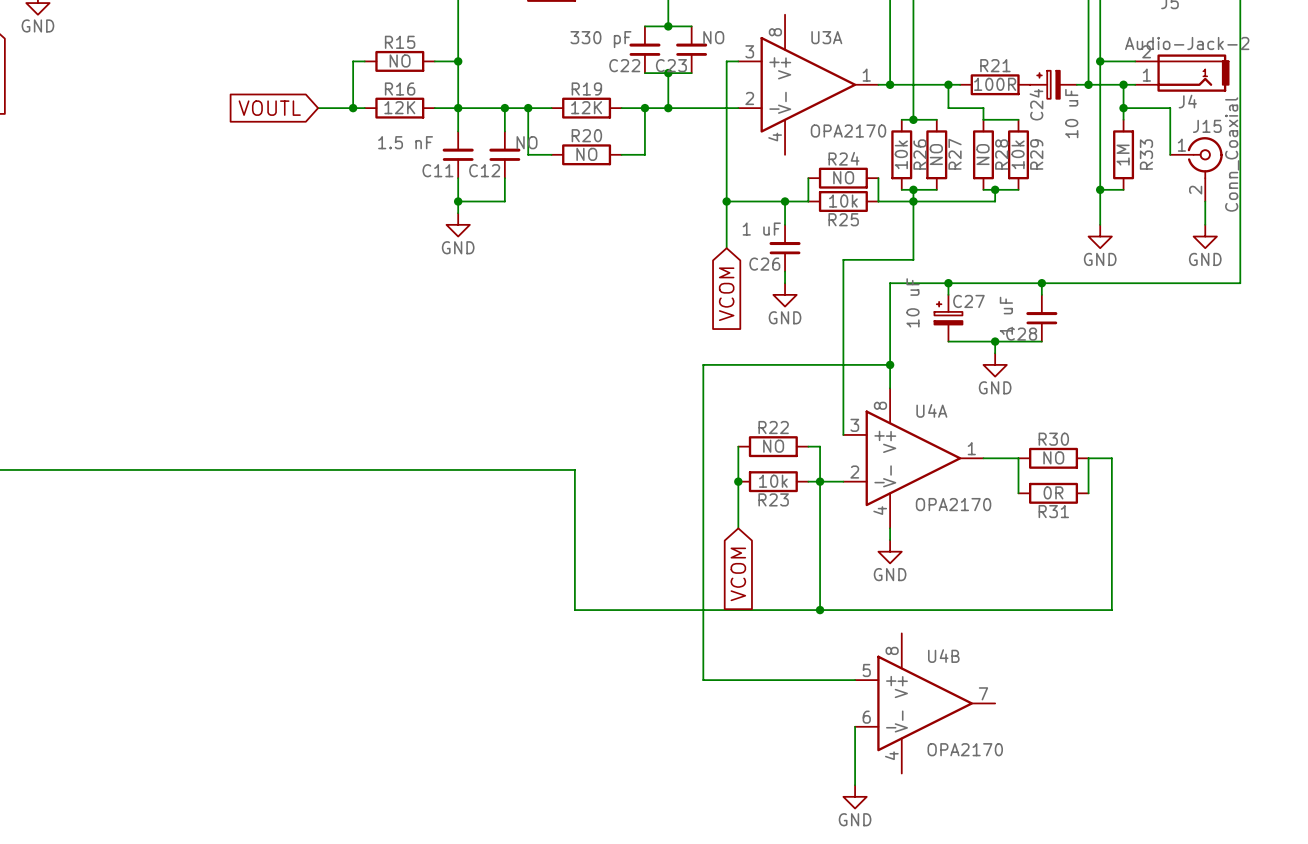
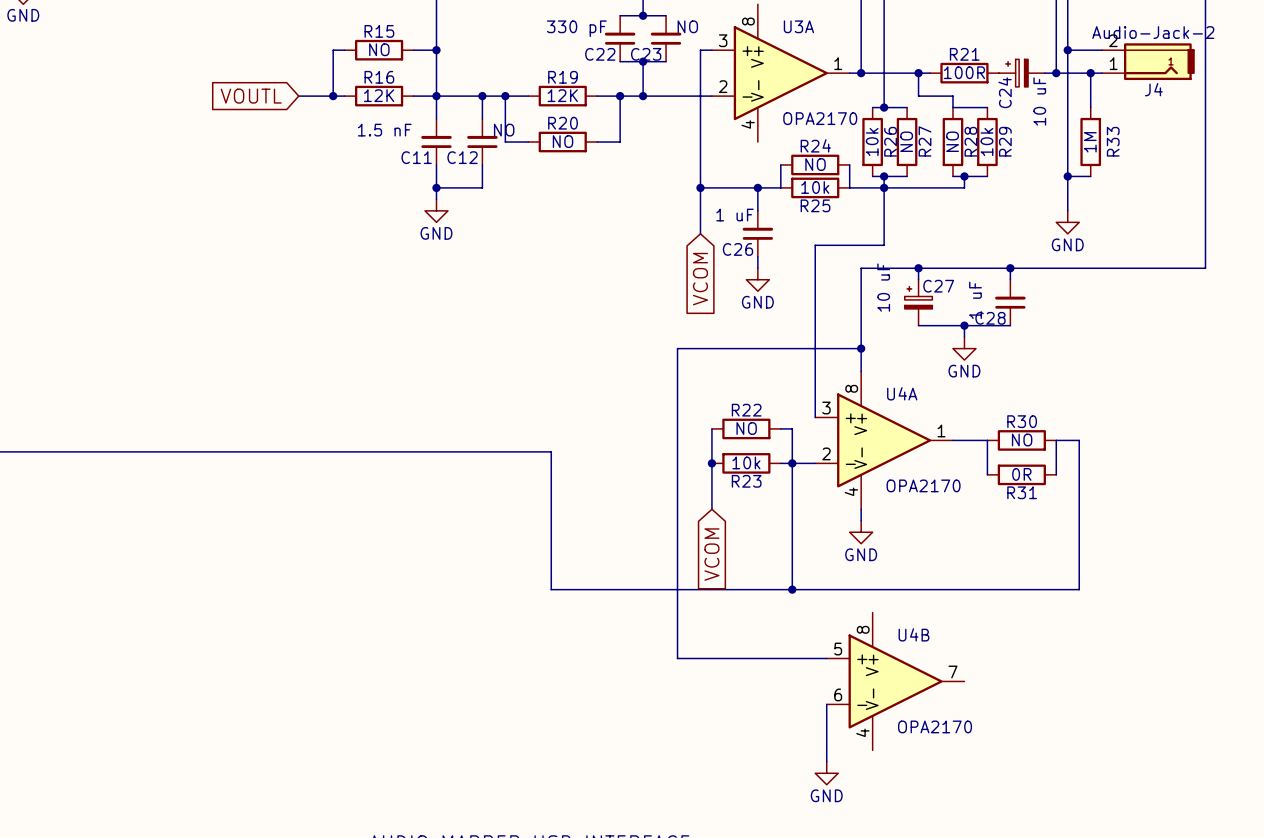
wire: (1123, 108) (1170, 108) (1170, 154) -> none
junction: (1123, 108) -> none
J15: Conn_Coaxial (1196, 169) -> none
wire: (1205, 201) (1205, 224) -> none
power symbol: GND (1205, 236) -> none

